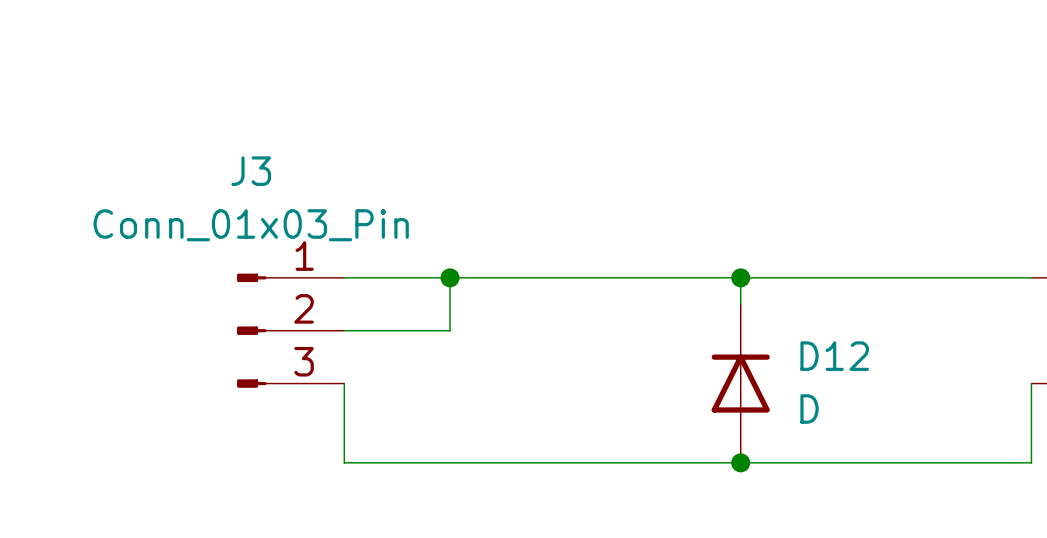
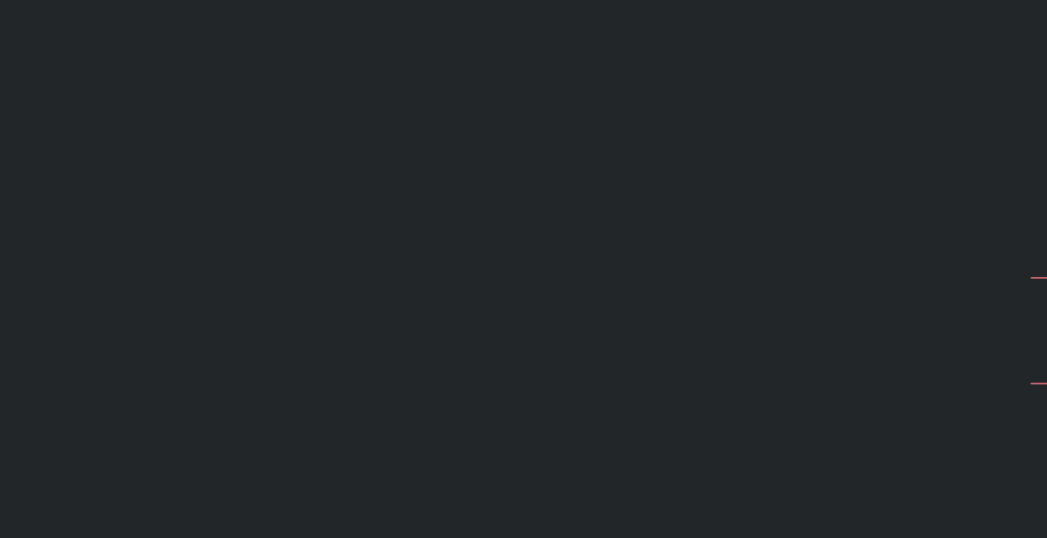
wire: (344, 277) (1031, 277) -> none
wire: (450, 277) (450, 330) (344, 330) -> none
junction: (450, 277) -> none
wire: (740, 277) (740, 304) -> none
junction: (740, 277) -> none
J3: Conn_01x03_Pin (290, 330) -> none
wire: (344, 383) (344, 462) (1031, 462) (1031, 383) -> none
D12: D (740, 383) -> none
junction: (740, 462) -> none

